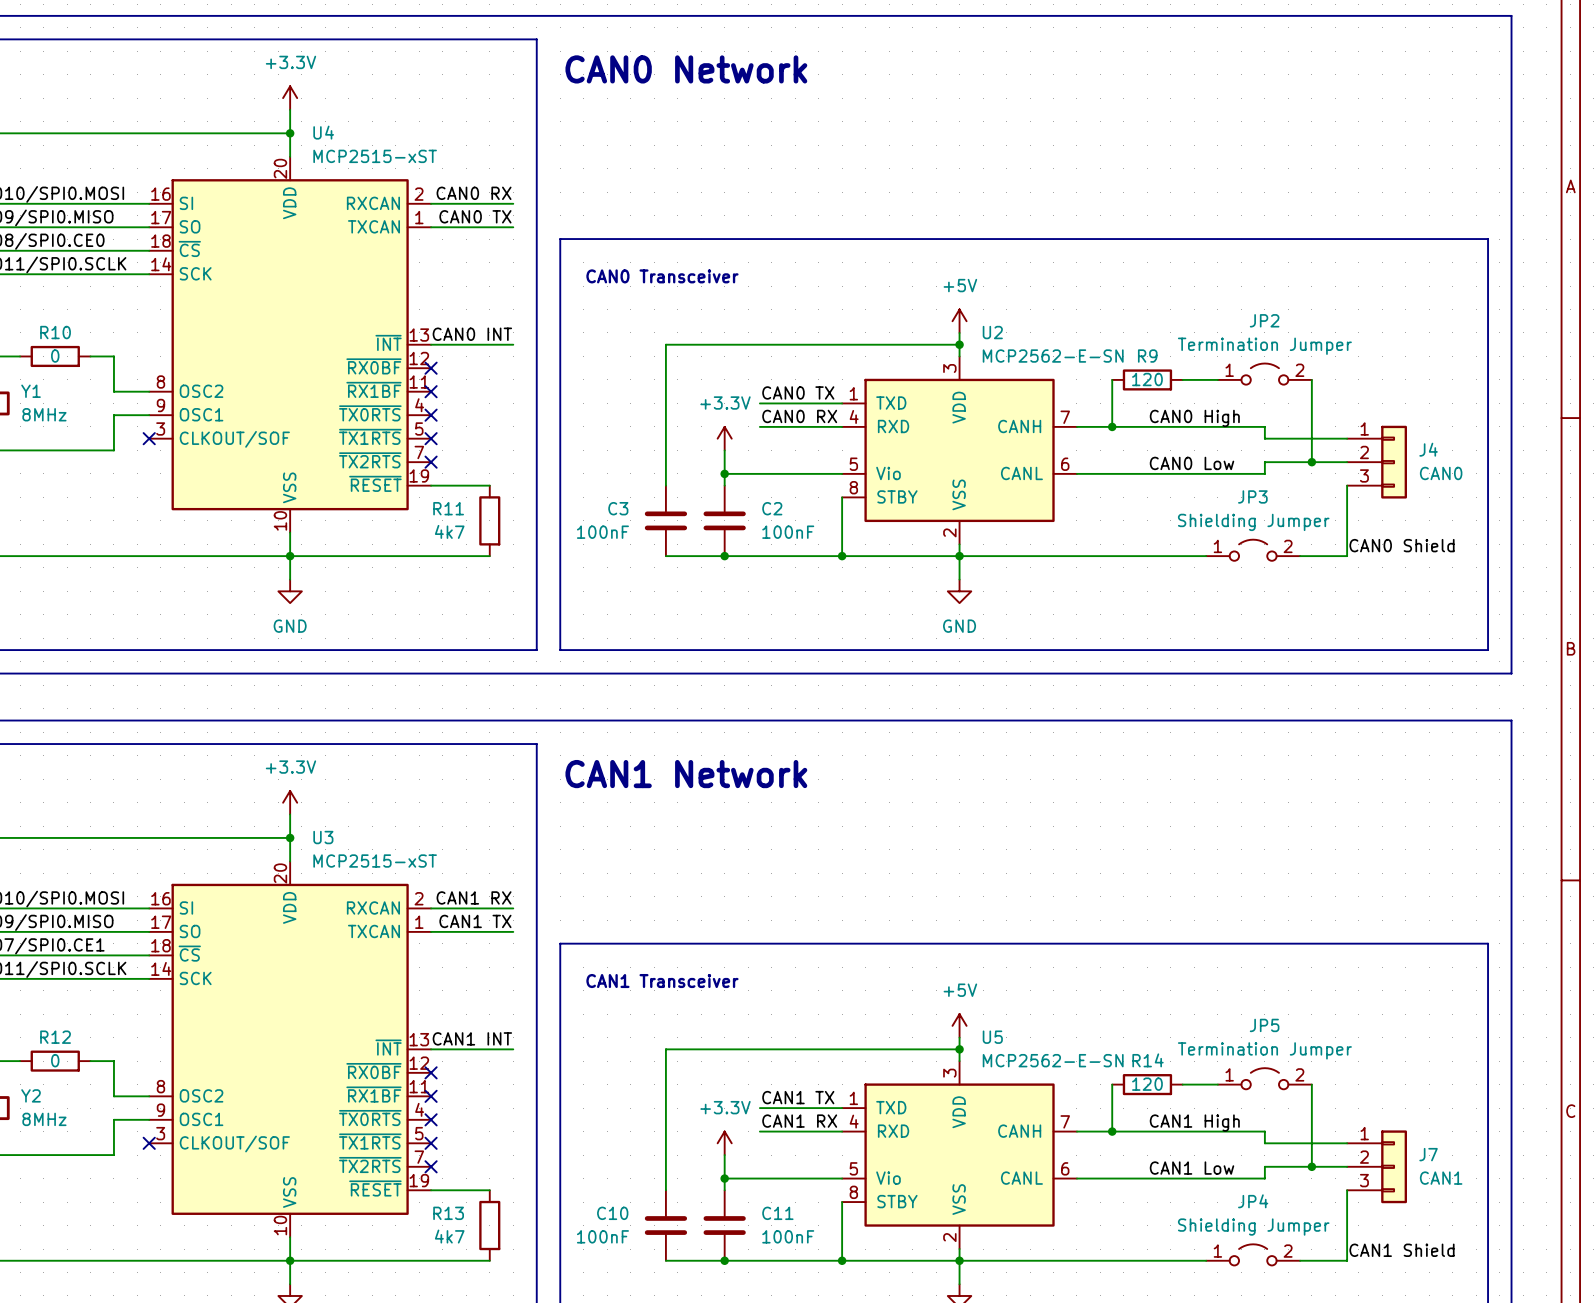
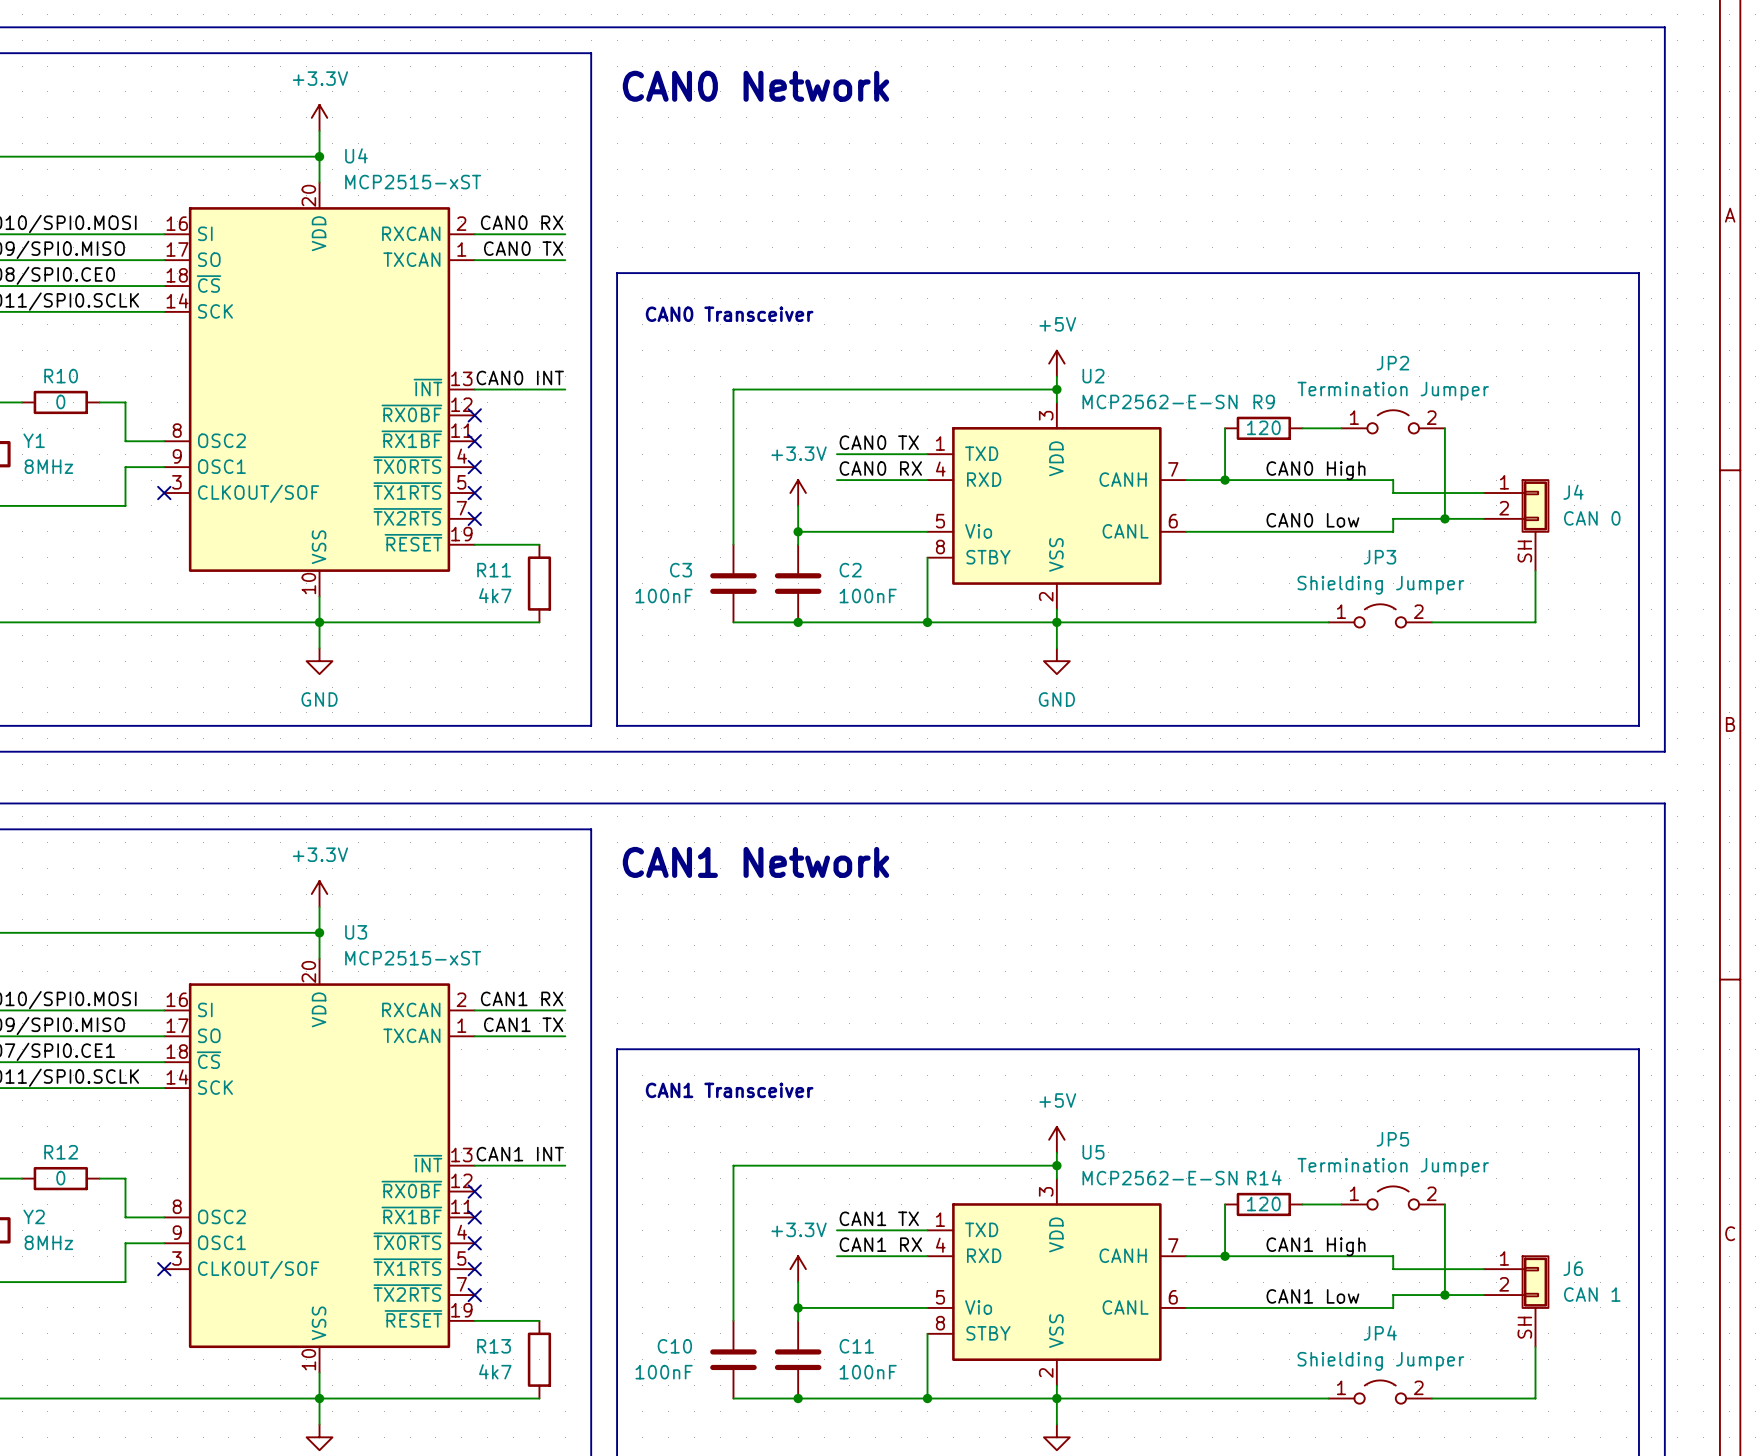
J4 symbol: [1347, 425, 1407, 499] -> [1483, 479, 1550, 571]
J4 value: CAN0 (1441, 473) -> CAN 0 (1592, 518)
wire: (1347, 485) (1347, 556) -> (1535, 570) (1535, 622) (1483, 622)
label: CAN0 Shield (1401, 545) -> none
J7: CAN1 (1377, 1166) -> none
J6: none -> CAN 1 (1516, 1301)
wire: (1347, 1190) (1347, 1260) -> (1535, 1346) (1535, 1398) (1483, 1398)
label: CAN1 Shield (1401, 1250) -> none

